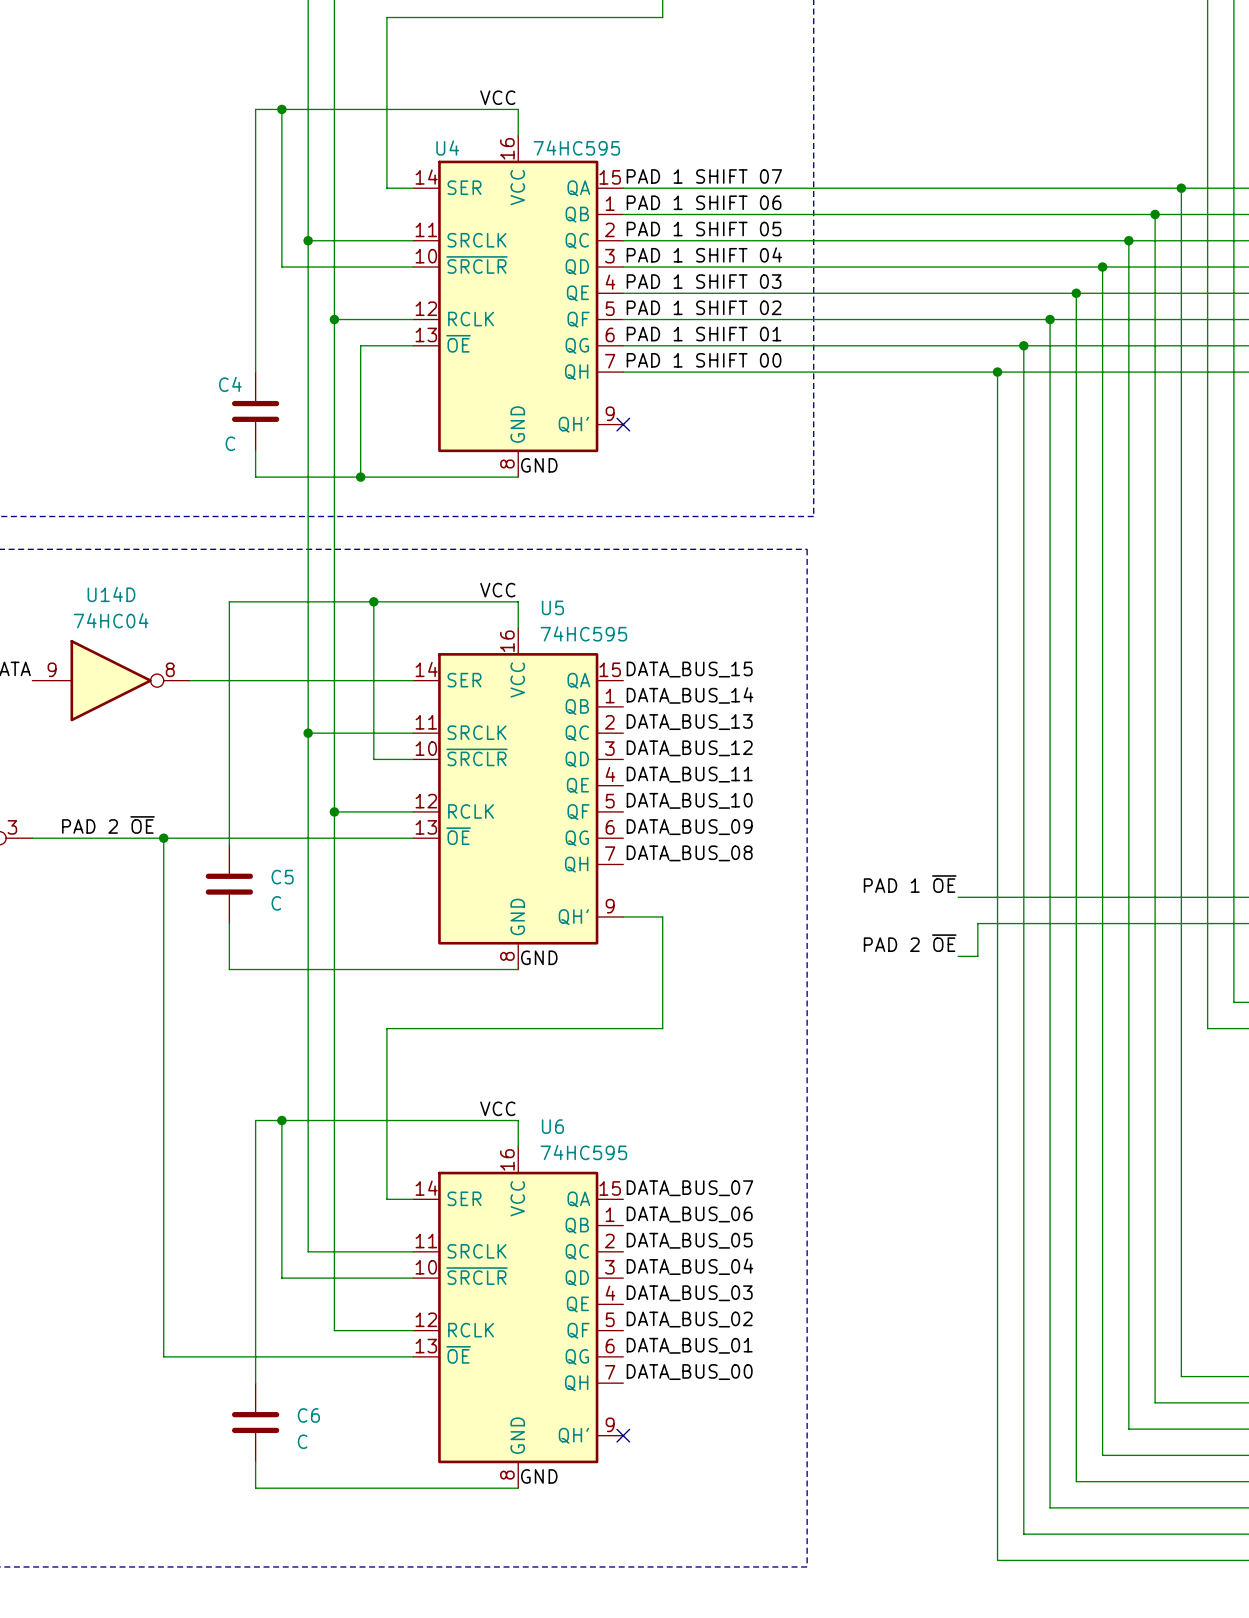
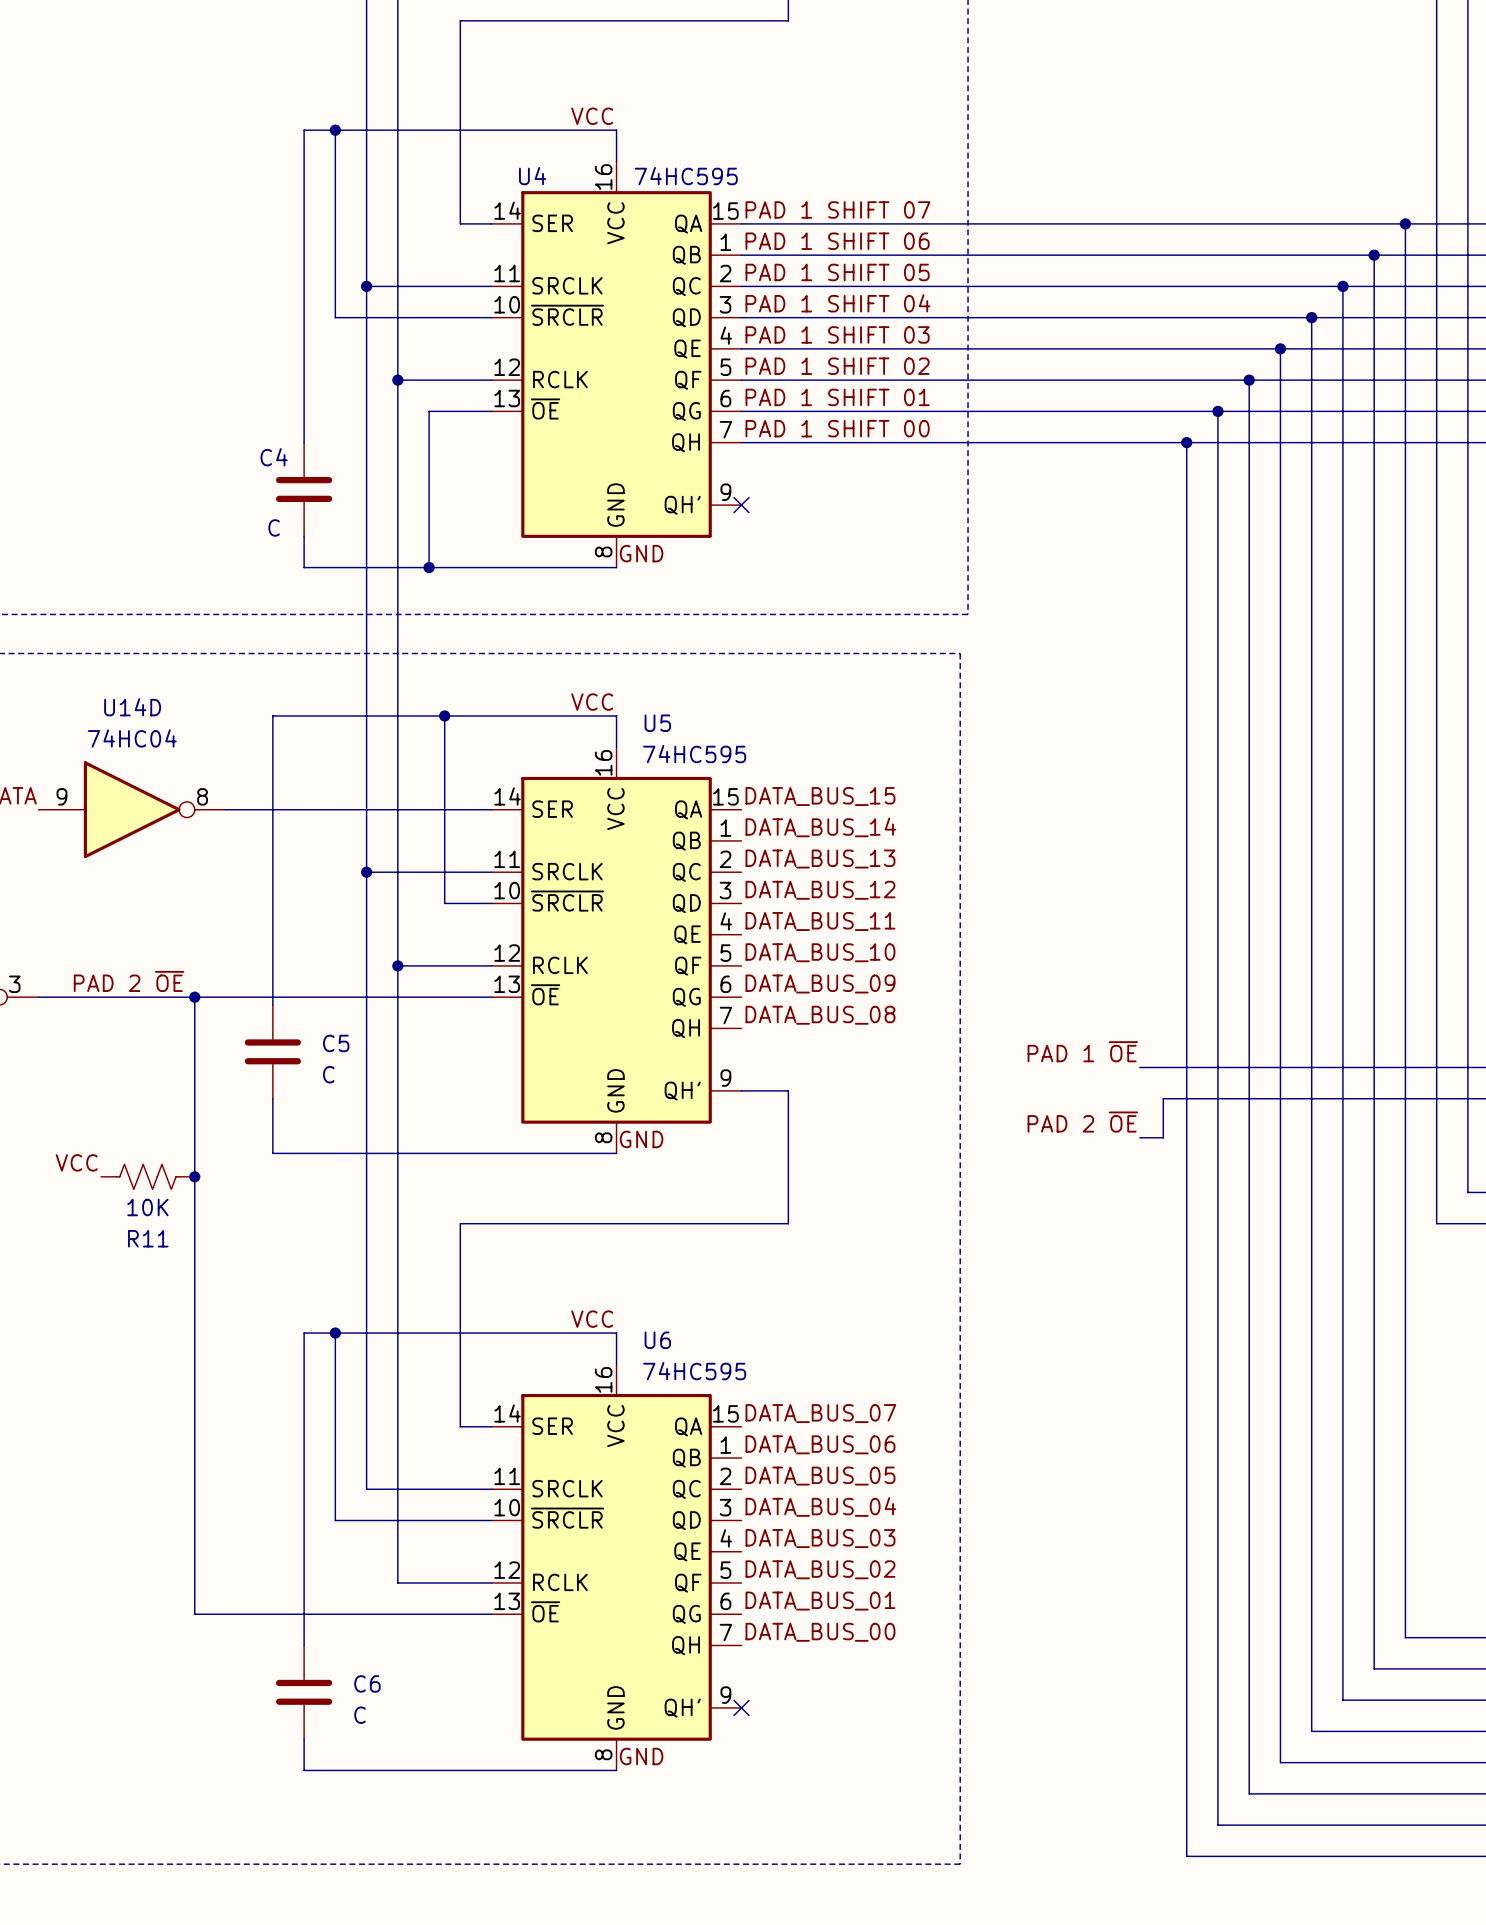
label: none -> VCC (76, 1162)
R11: none -> 10K (147, 1176)
junction: none -> (194, 1176)

